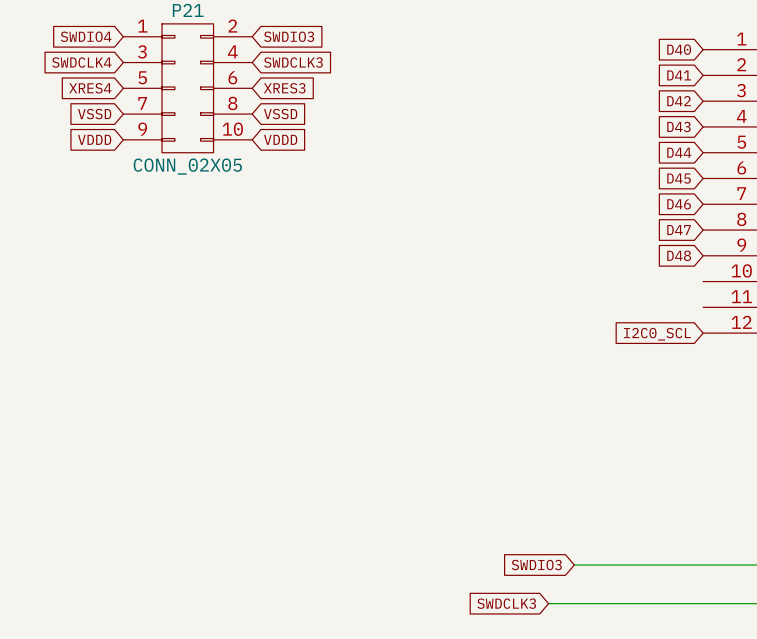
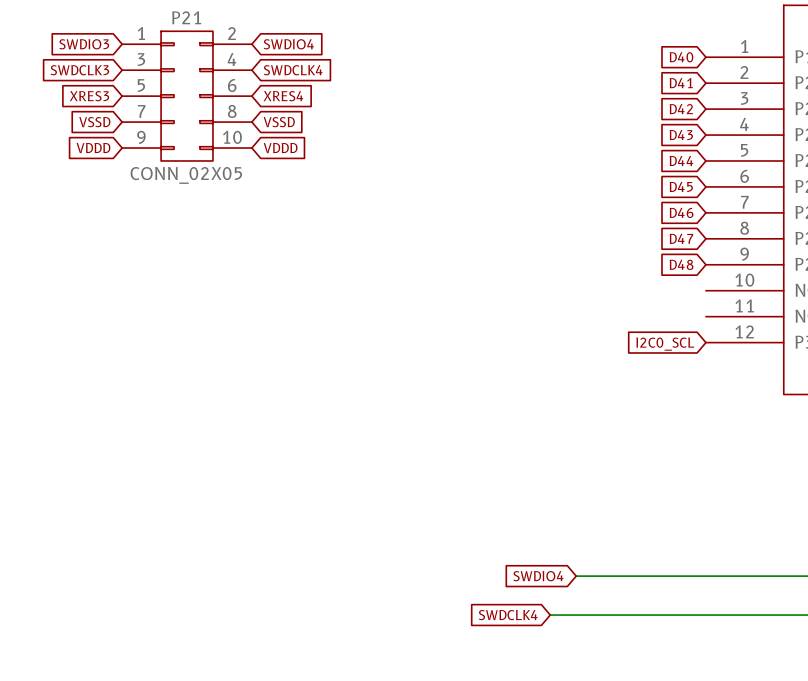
global label: SWDIO4 (86, 36) -> SWDIO3 (84, 44)
global label: SWDIO3 (289, 36) -> SWDIO4 (288, 44)
global label: SWDCLK4 (81, 62) -> SWDCLK3 (79, 70)
global label: SWDCLK3 (293, 62) -> SWDCLK4 (293, 70)
global label: XRES4 (90, 88) -> XRES3 (89, 96)
global label: XRES3 (284, 88) -> XRES4 (283, 96)
global label: SWDIO3 (536, 565) -> SWDIO4 (538, 576)
global label: SWDCLK3 (506, 603) -> SWDCLK4 (508, 615)

